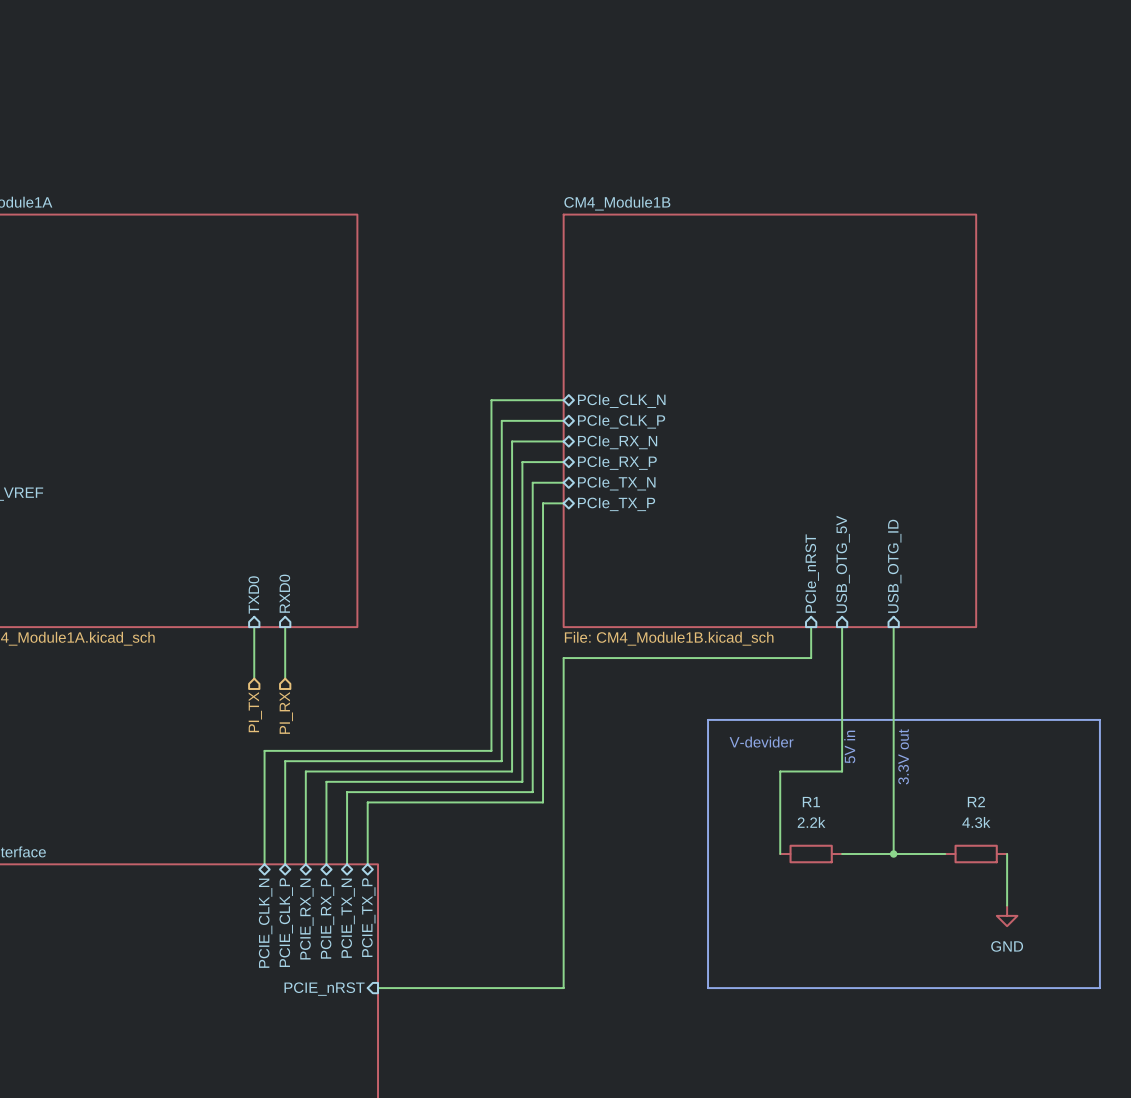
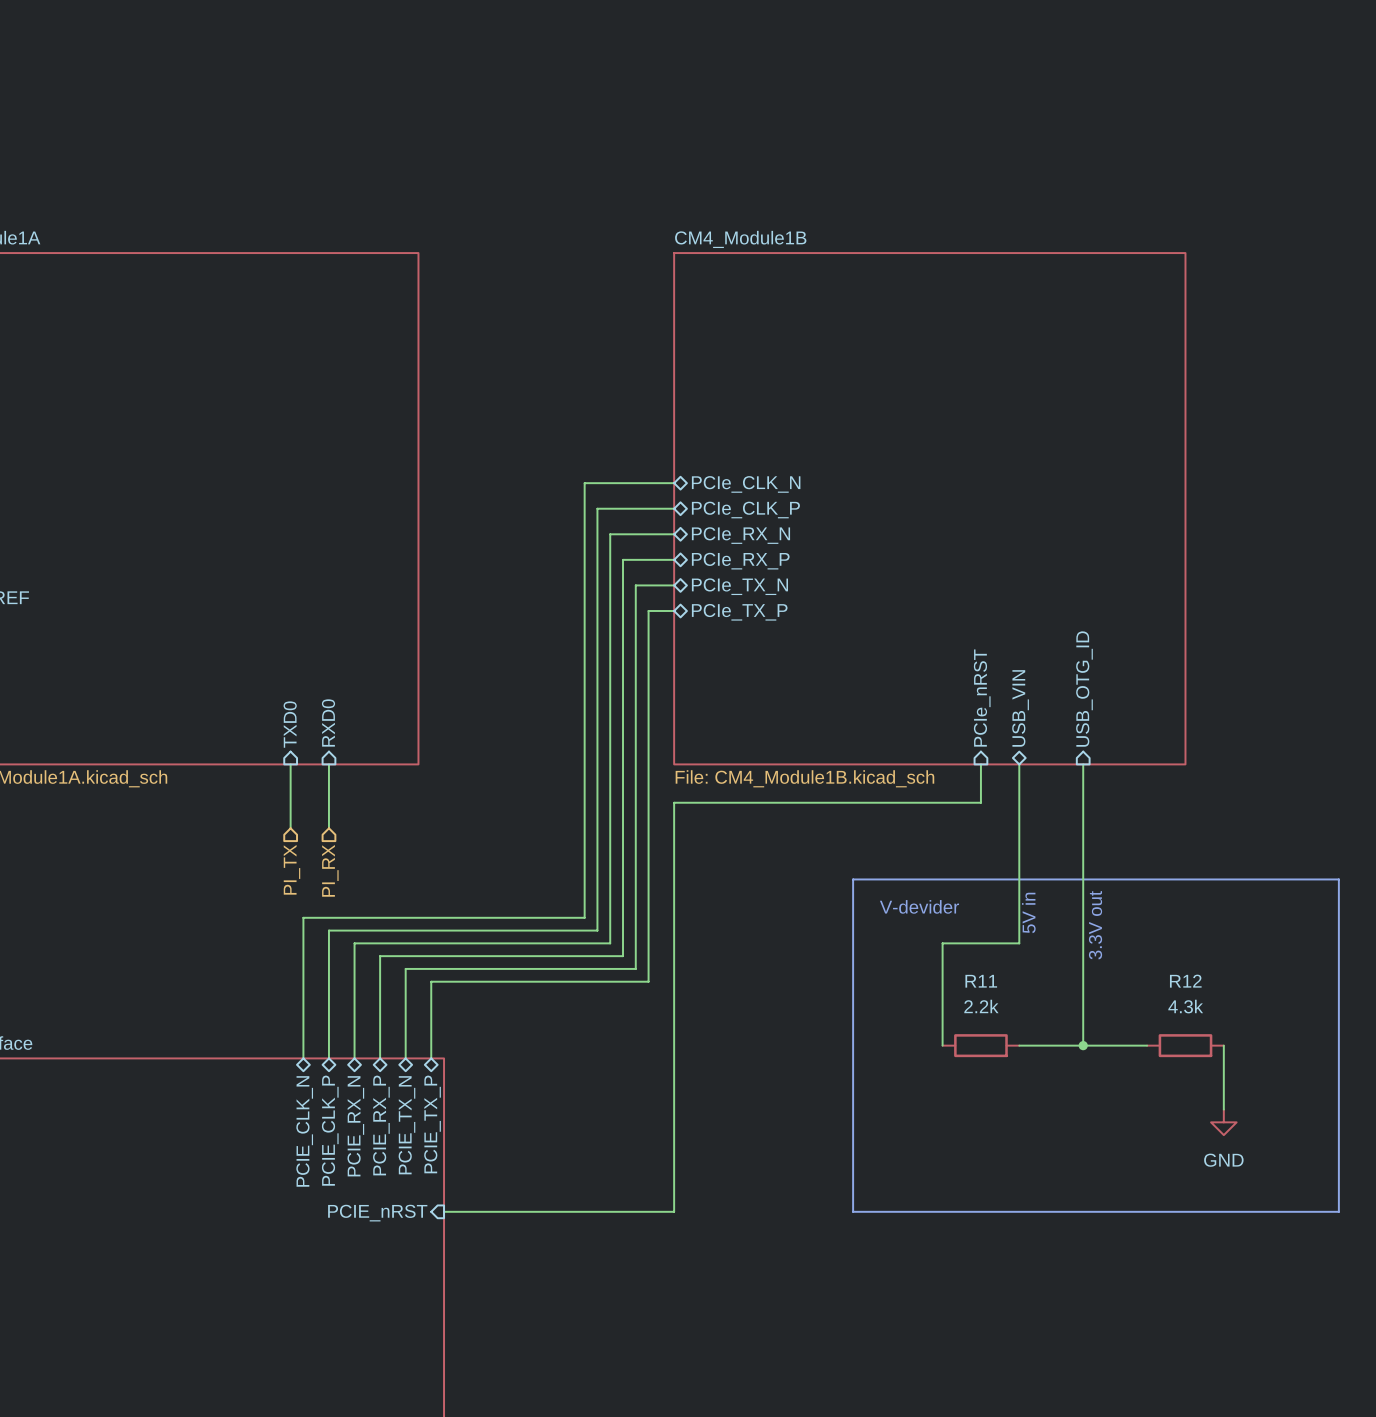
sheet pin shape: input (843, 564) -> bidirectional (1020, 708)
sheet pin: USB_OTG_5V (843, 564) -> USB_VIN (1020, 708)
R2 name: R2 (976, 801) -> R12 (1185, 981)
R1 name: R1 (811, 802) -> R11 (981, 981)

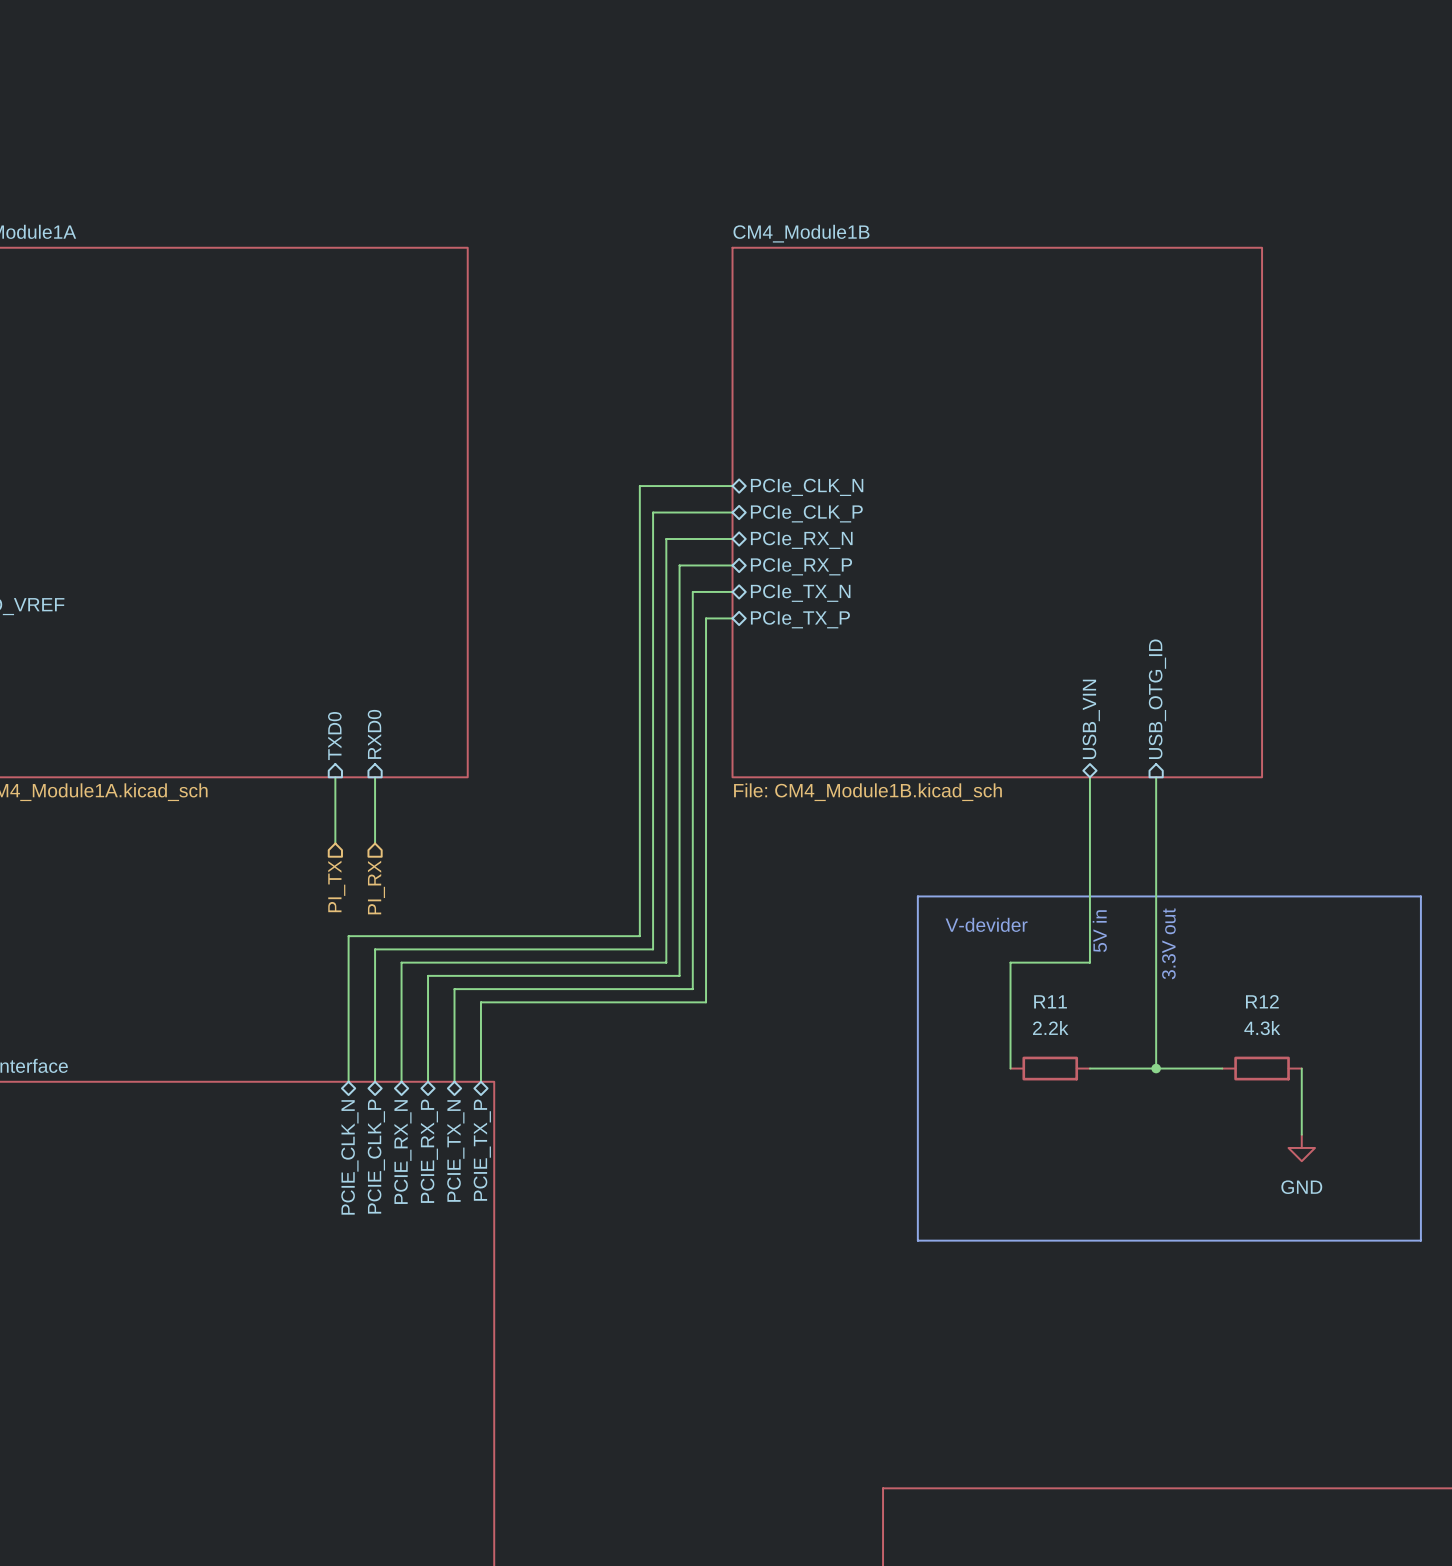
sheet pin: PCIe_nRST (982, 698) -> none
wire: (980, 764) (980, 802) (674, 802) (674, 1211) (444, 1211) -> none
sheet pin: PCIE_nRST (377, 1213) -> none

